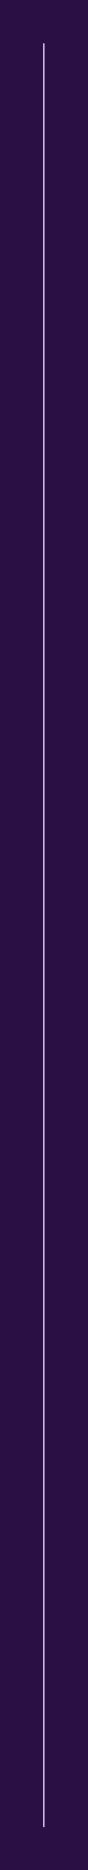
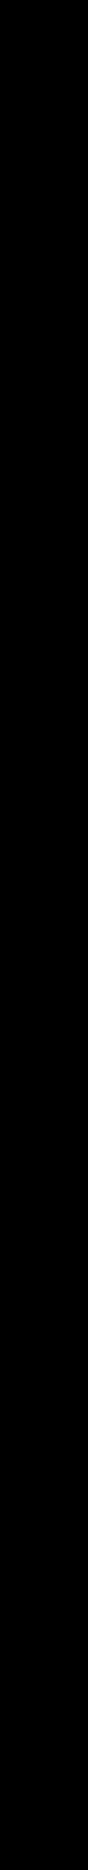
board edge: (43, 43) (43, 1826) -> none

